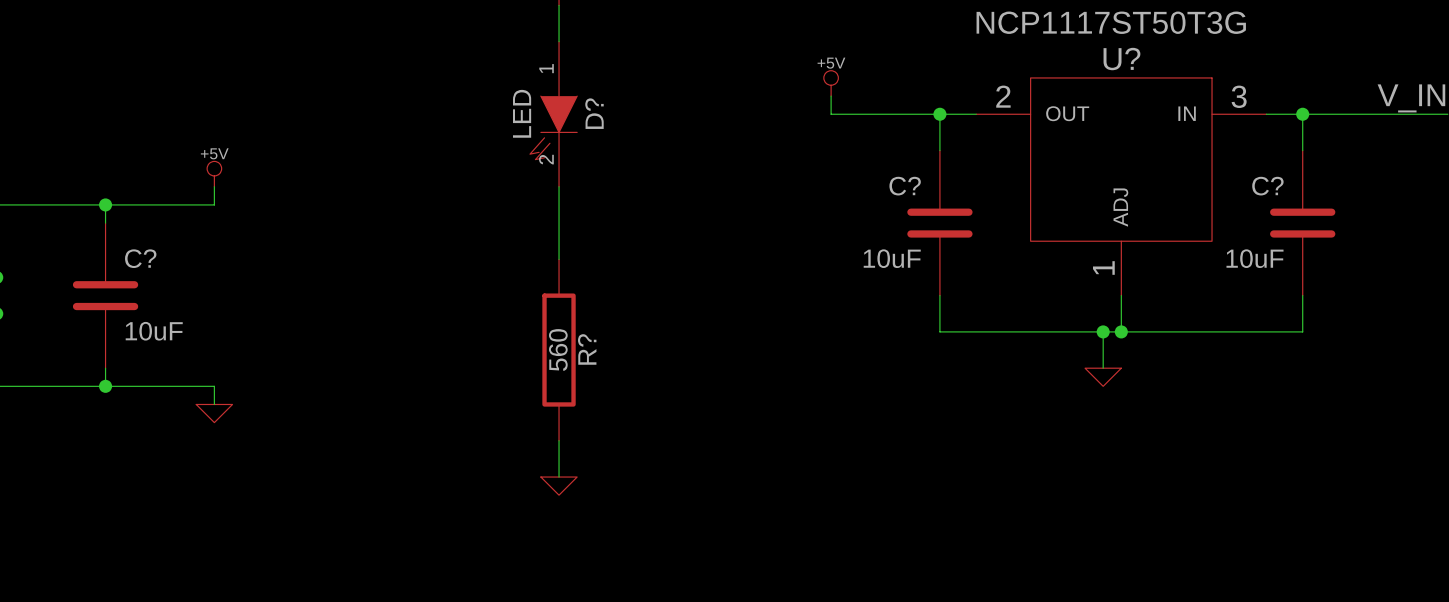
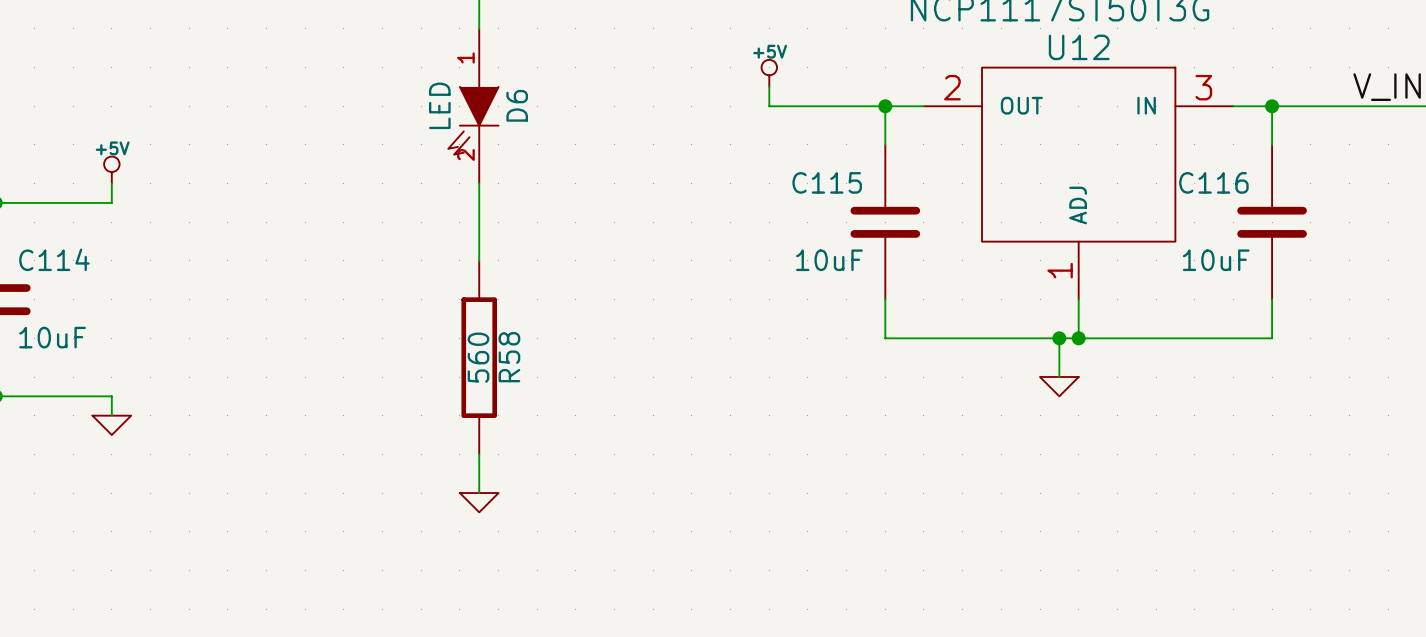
U? name: U? (1121, 59) -> U12 (1079, 47)
D? name: D? (594, 113) -> D6 (517, 105)
C? name: C? (905, 186) -> C115 (827, 182)
C? name: C? (1267, 186) -> C116 (1213, 182)
C? name: C? (140, 258) -> C114 (54, 259)
R? name: R? (587, 349) -> R58 (509, 357)

